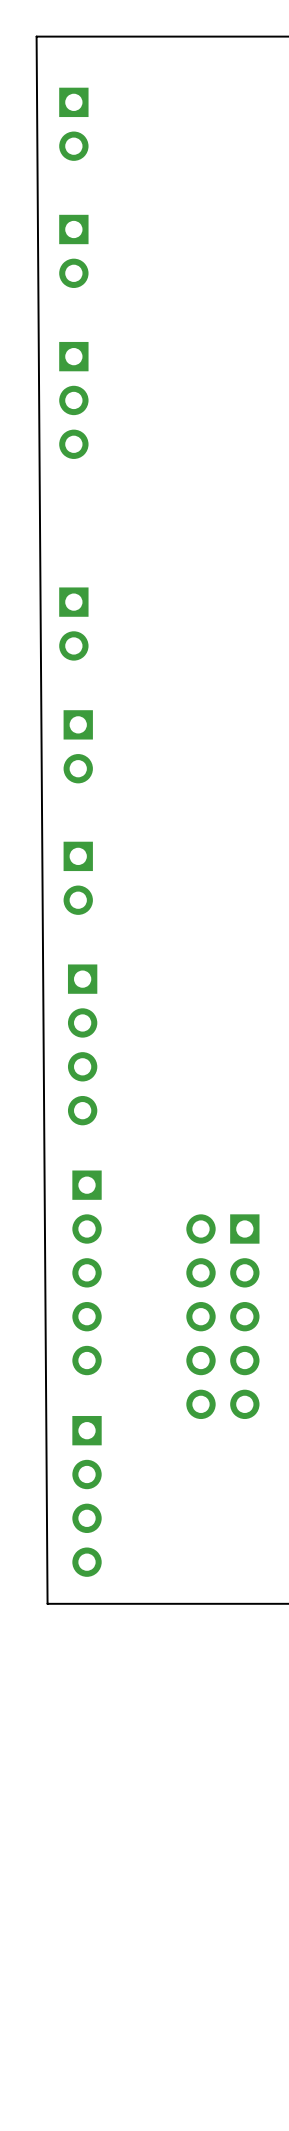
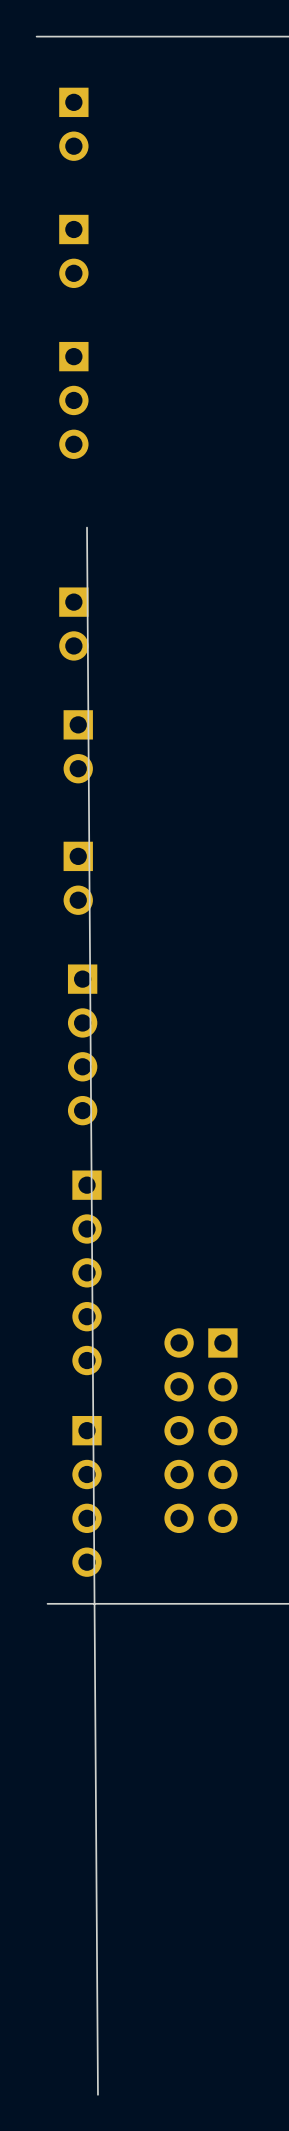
board edge: (36, 36) (47, 1603) -> none
board edge: none -> (87, 527) (97, 2094)
part position: (222, 1316) -> (201, 1430)

